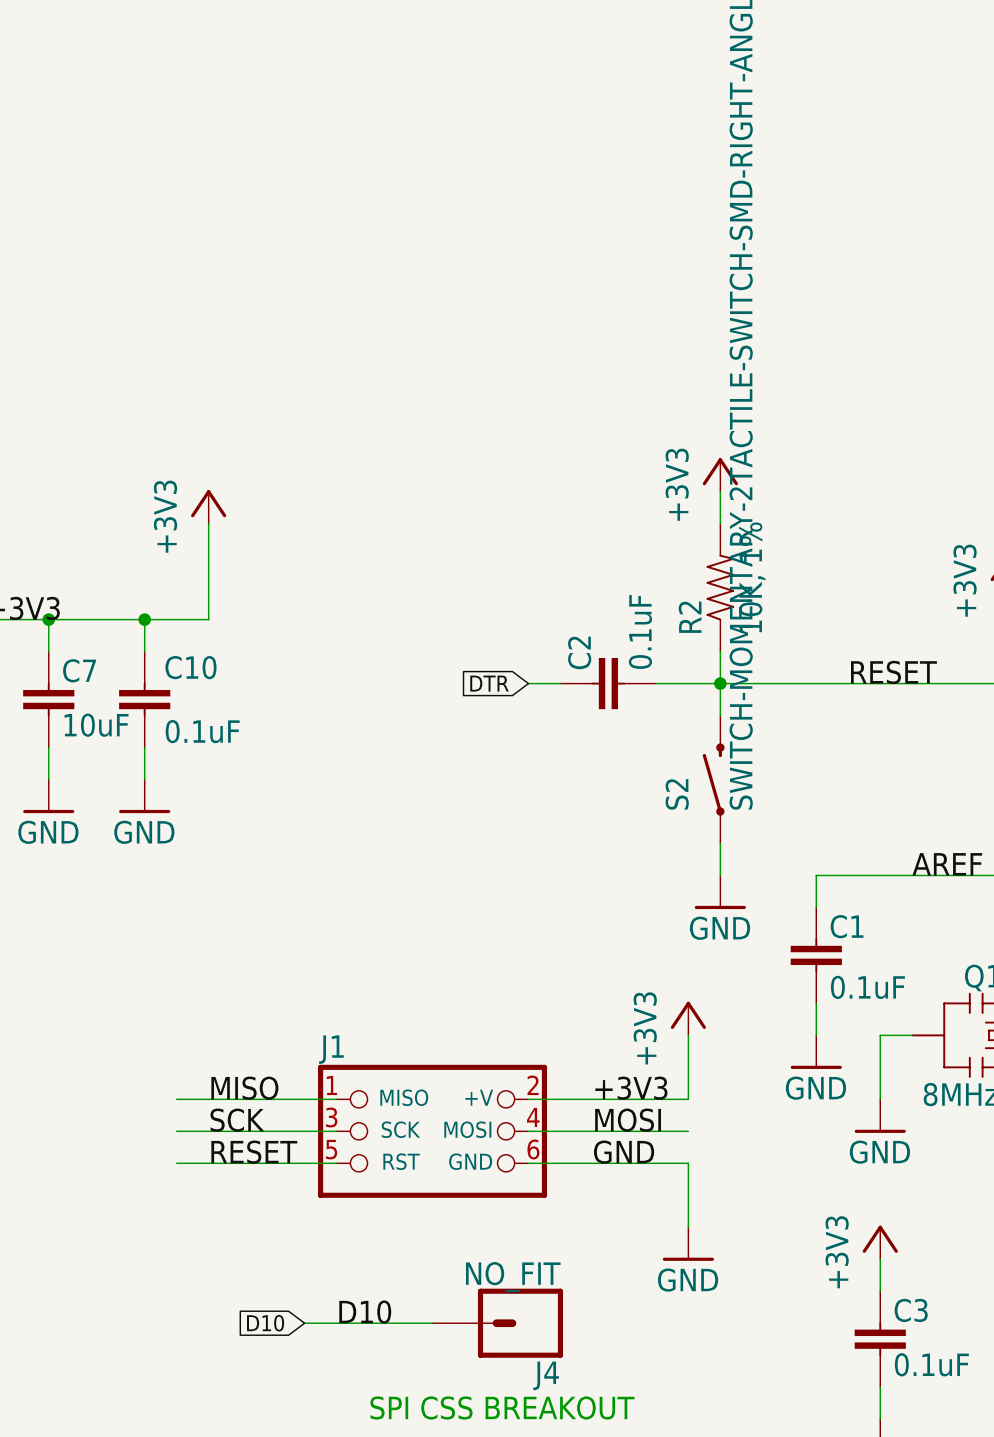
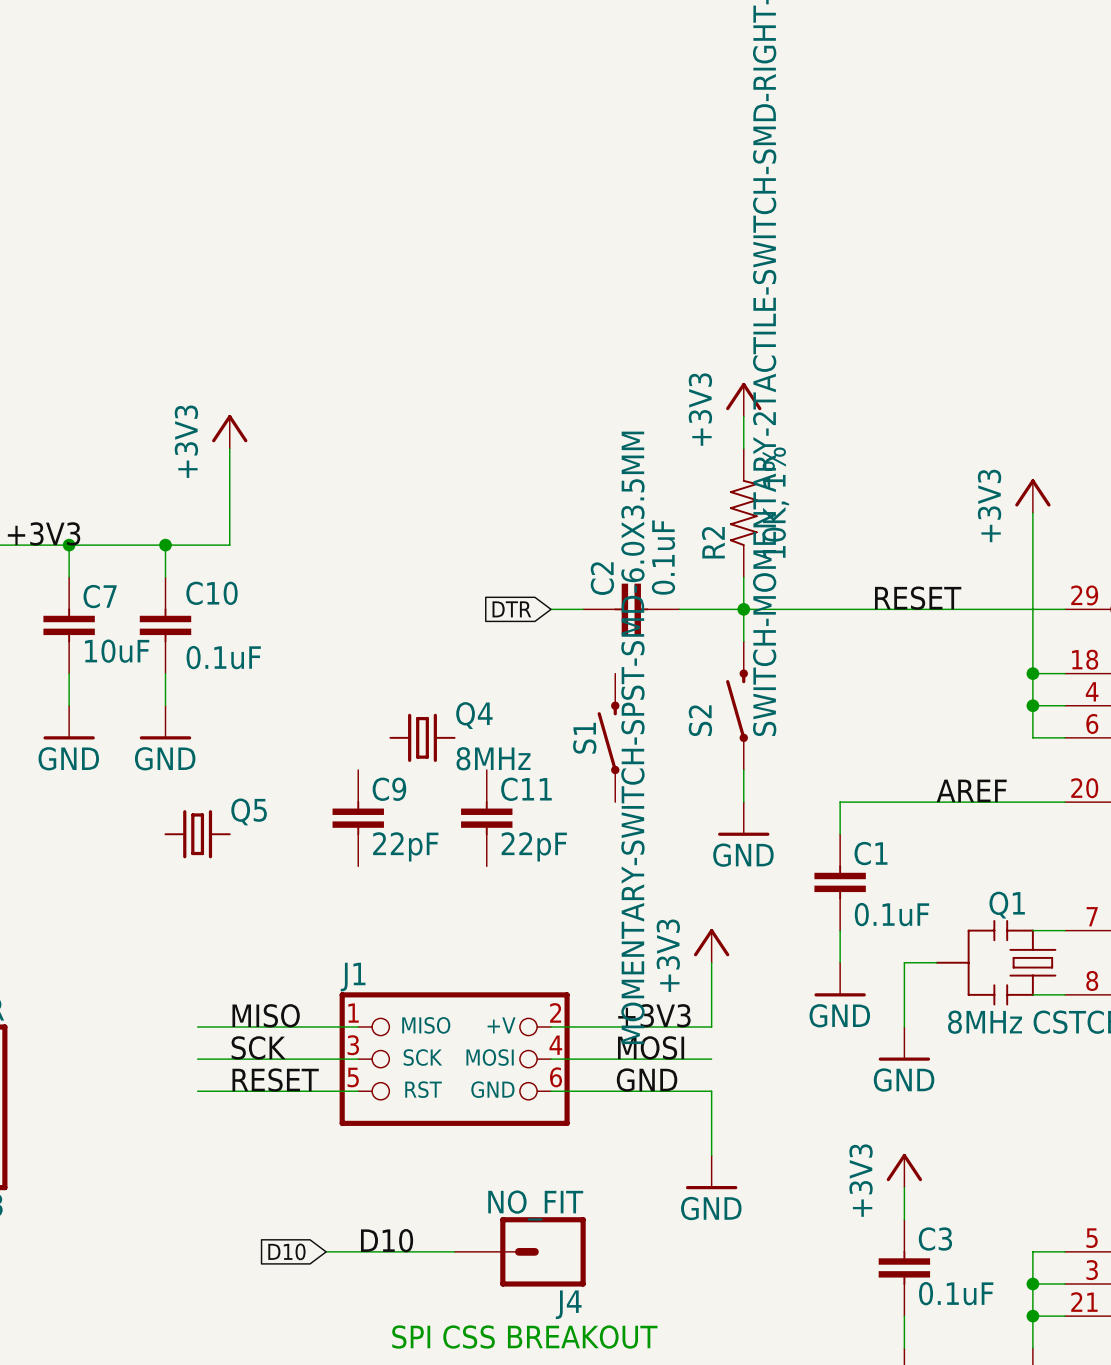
Q4: none -> 8MHz (422, 737)
S1: none -> MOMENTARY-SWITCH-SPST-SMD-6.0X3.5MM (608, 737)
C9: none -> 22pF (358, 818)
C11: none -> 22pF (486, 818)
Q5: none -> (197, 834)

